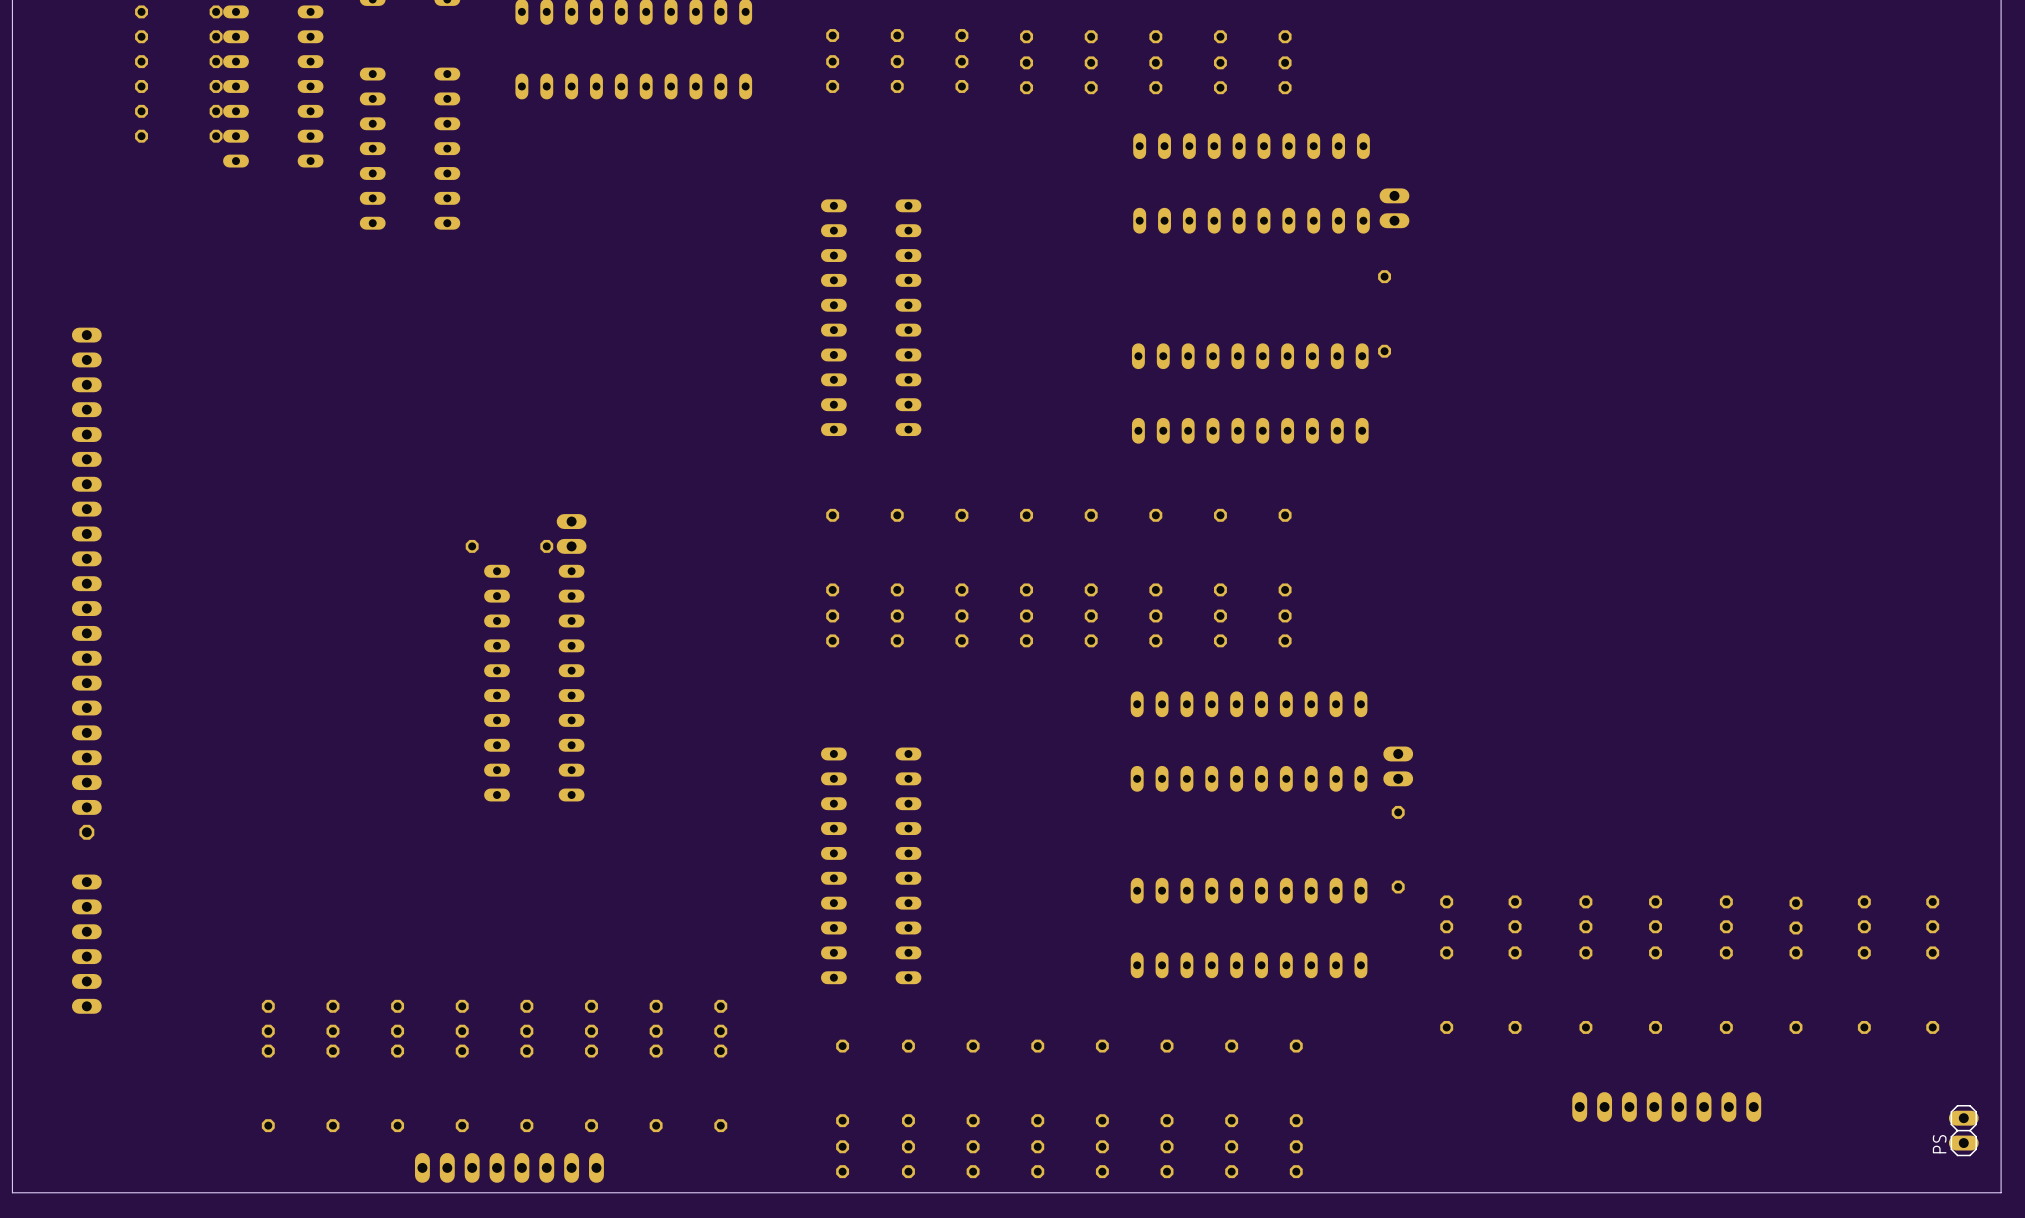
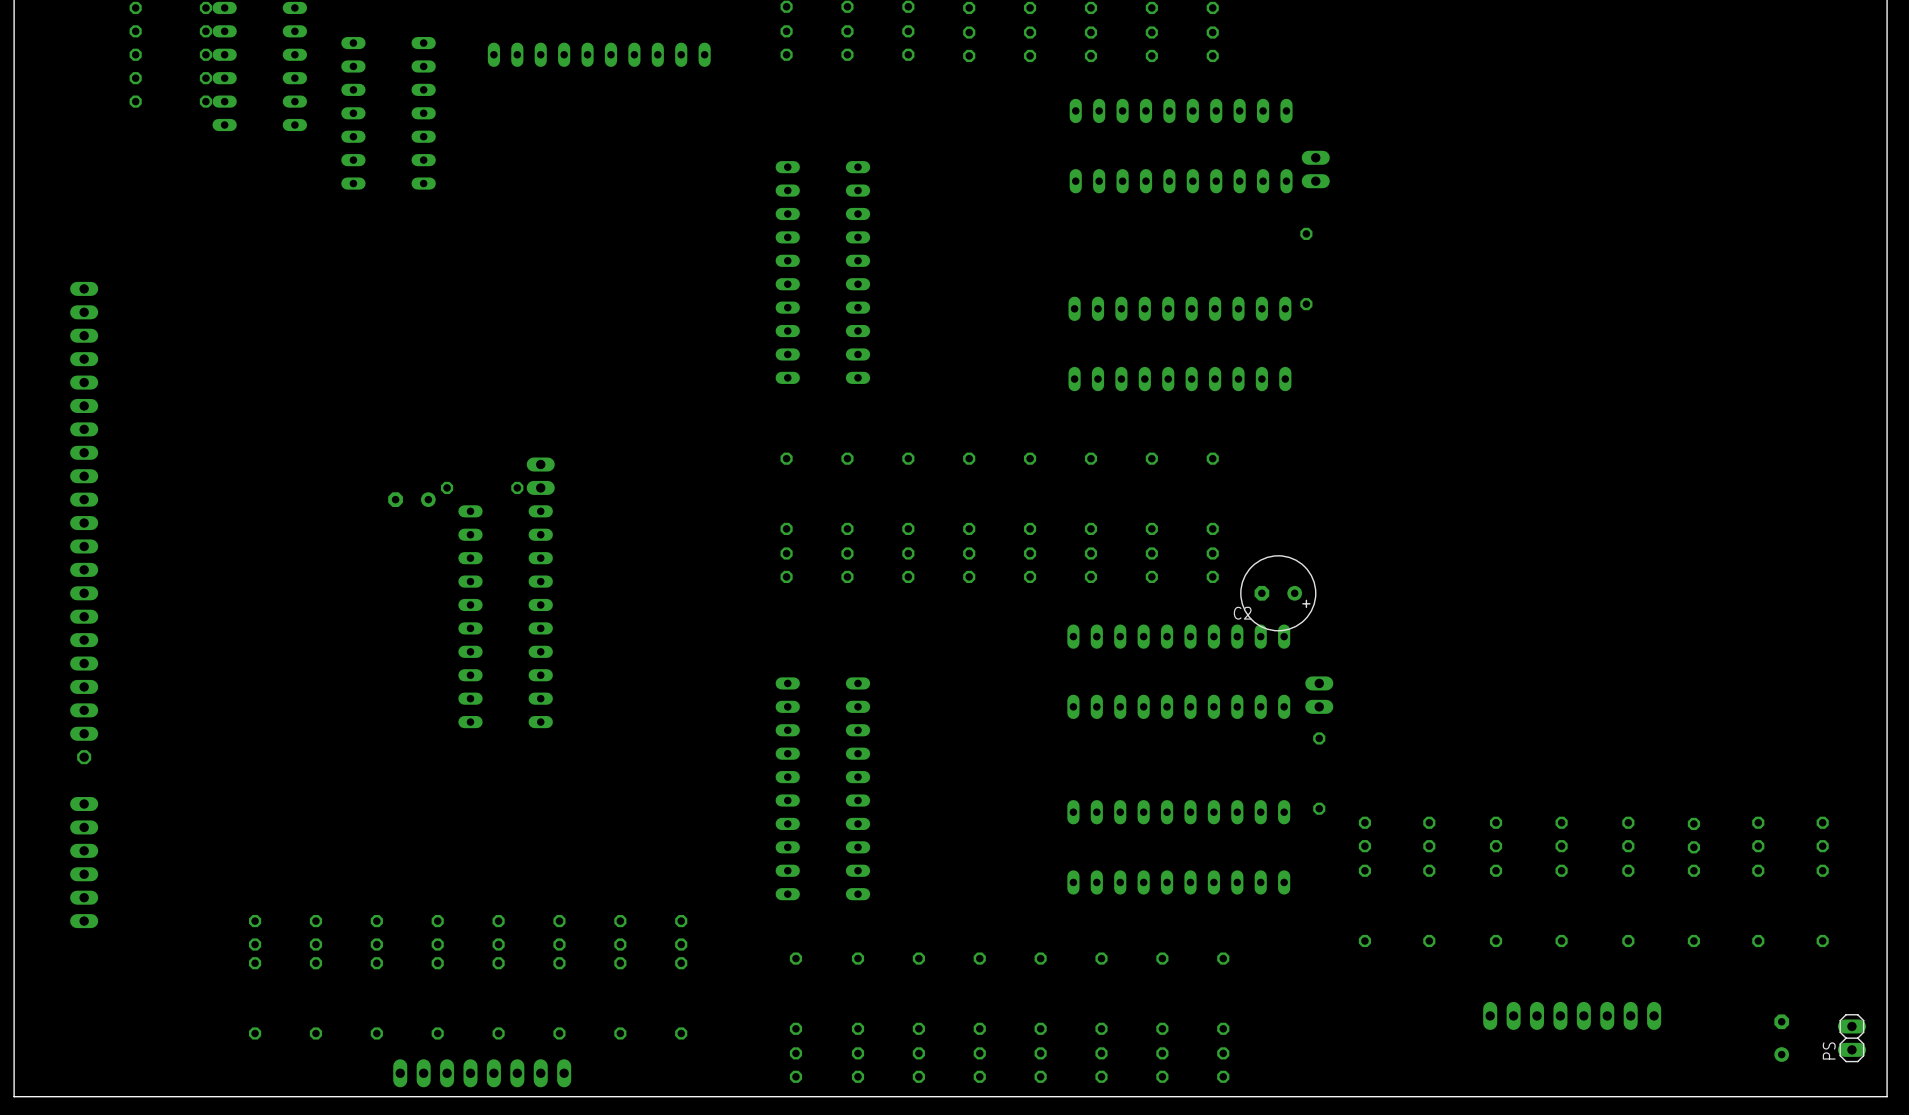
part: none -> (411, 499)
C2: none -> (1278, 593)
part: none -> (1781, 1038)

